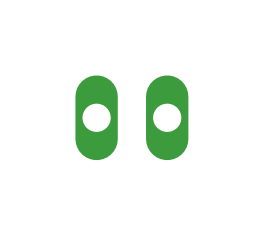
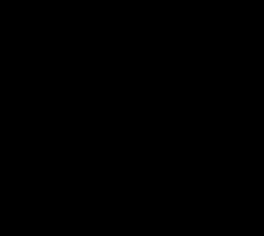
part: (131, 117) -> none

